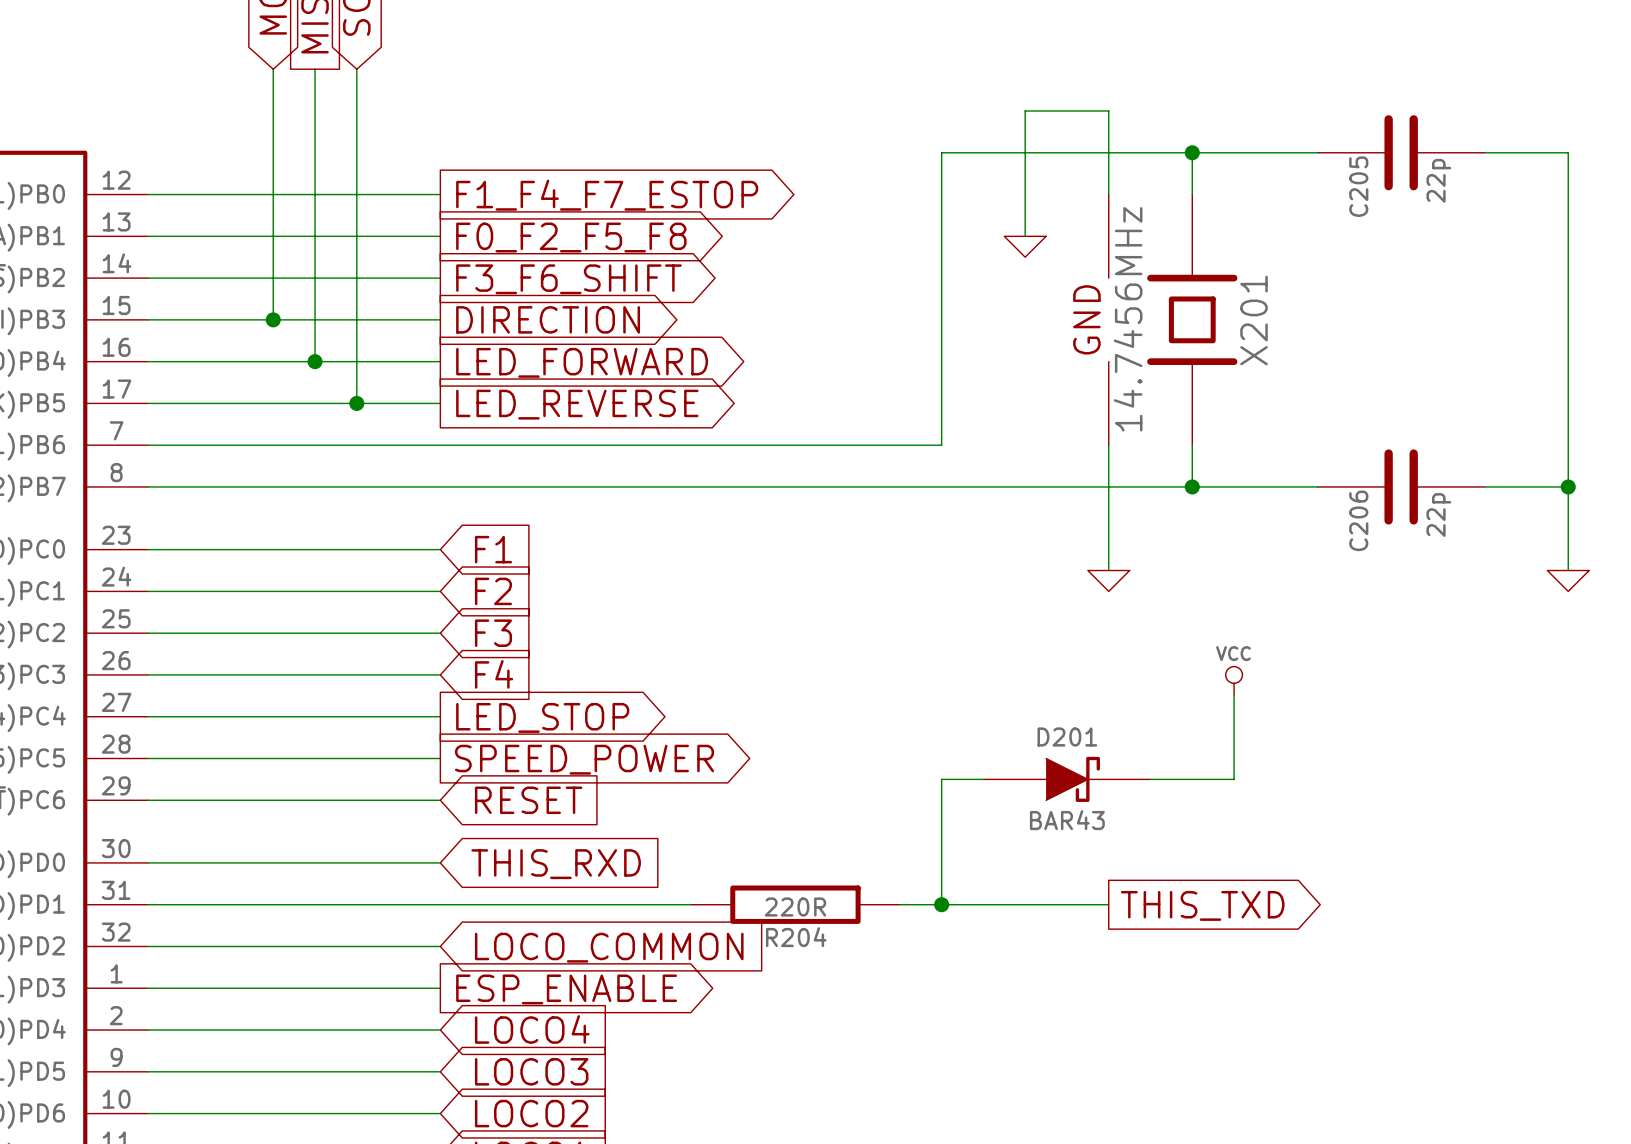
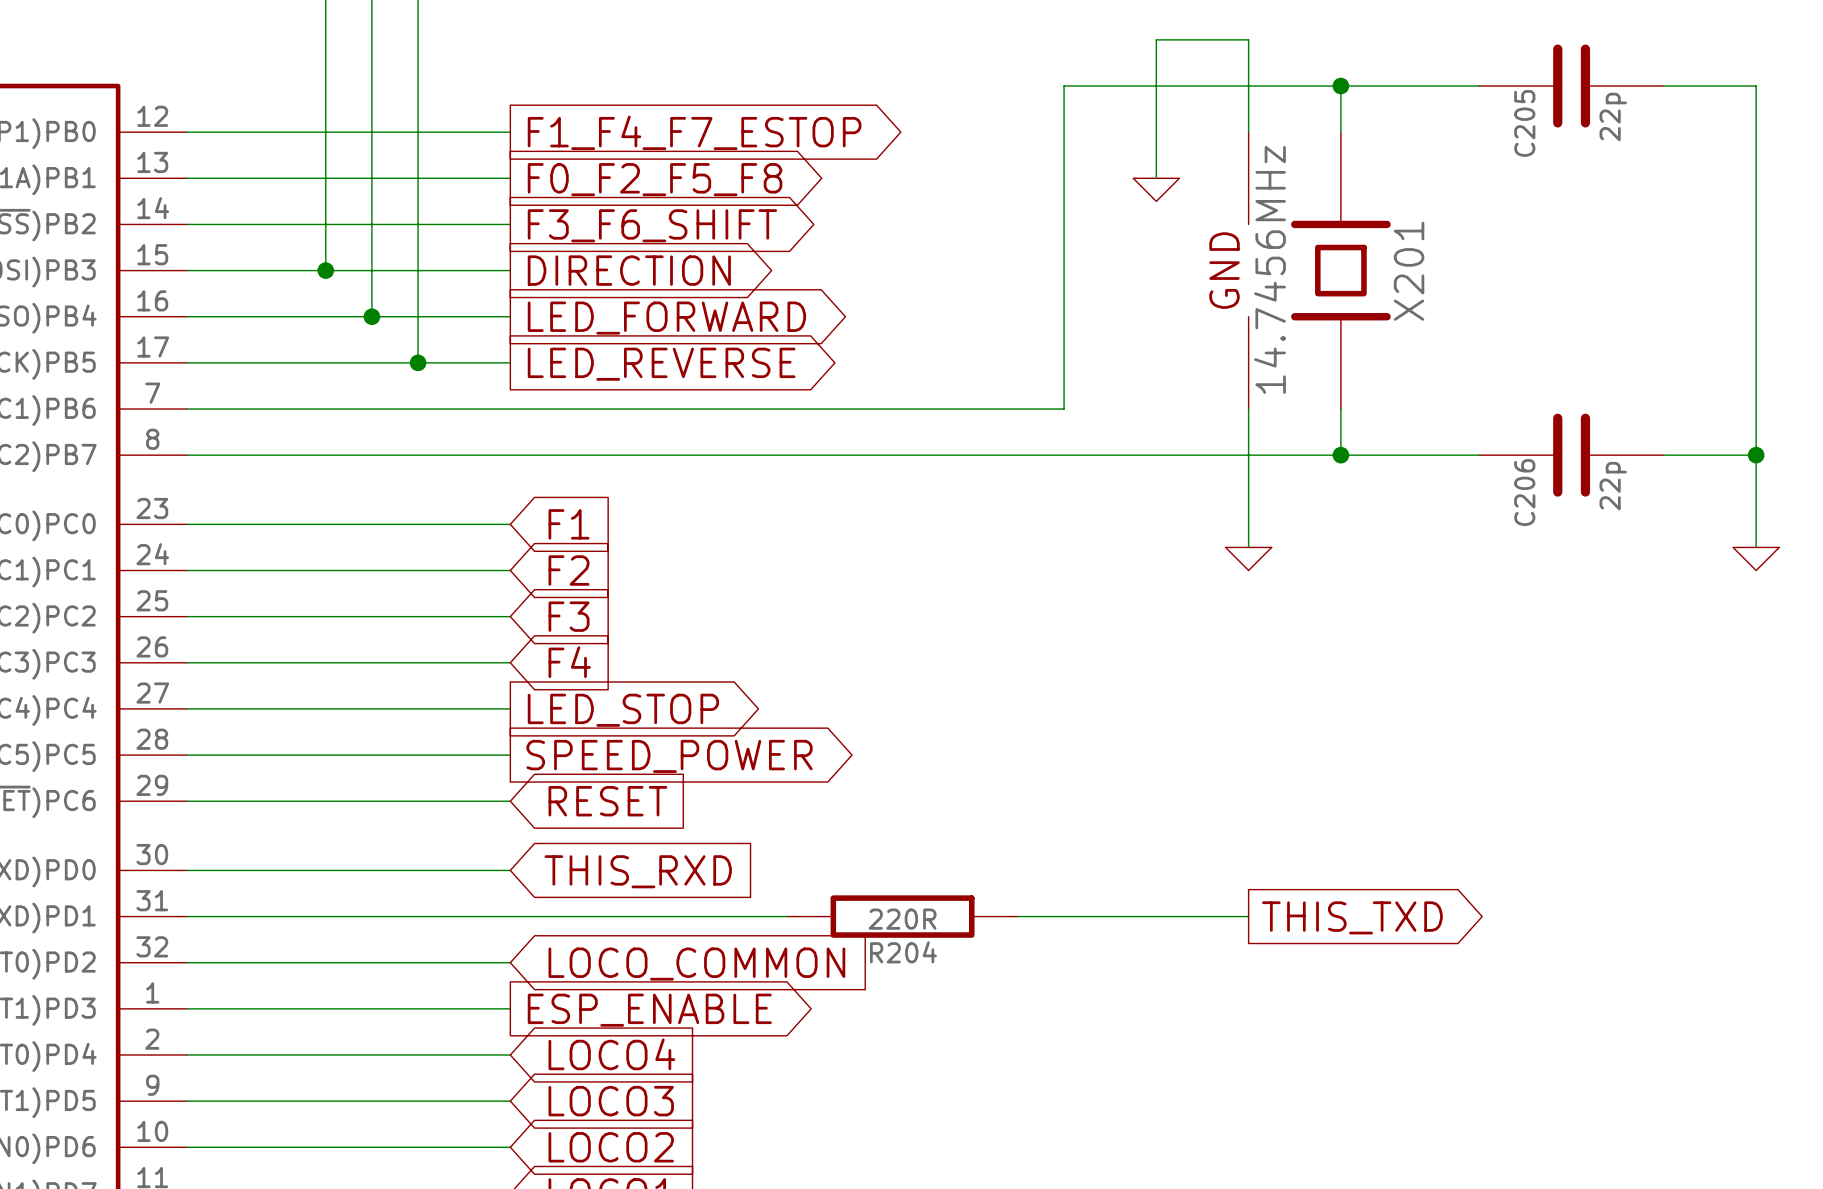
power symbol: VCC (1234, 681) -> none
wire: (1234, 695) (1234, 779) (1150, 779) -> none
wire: (983, 779) (941, 779) (941, 904) -> none
D201: BAR43 (1066, 779) -> none
junction: (941, 904) -> none

